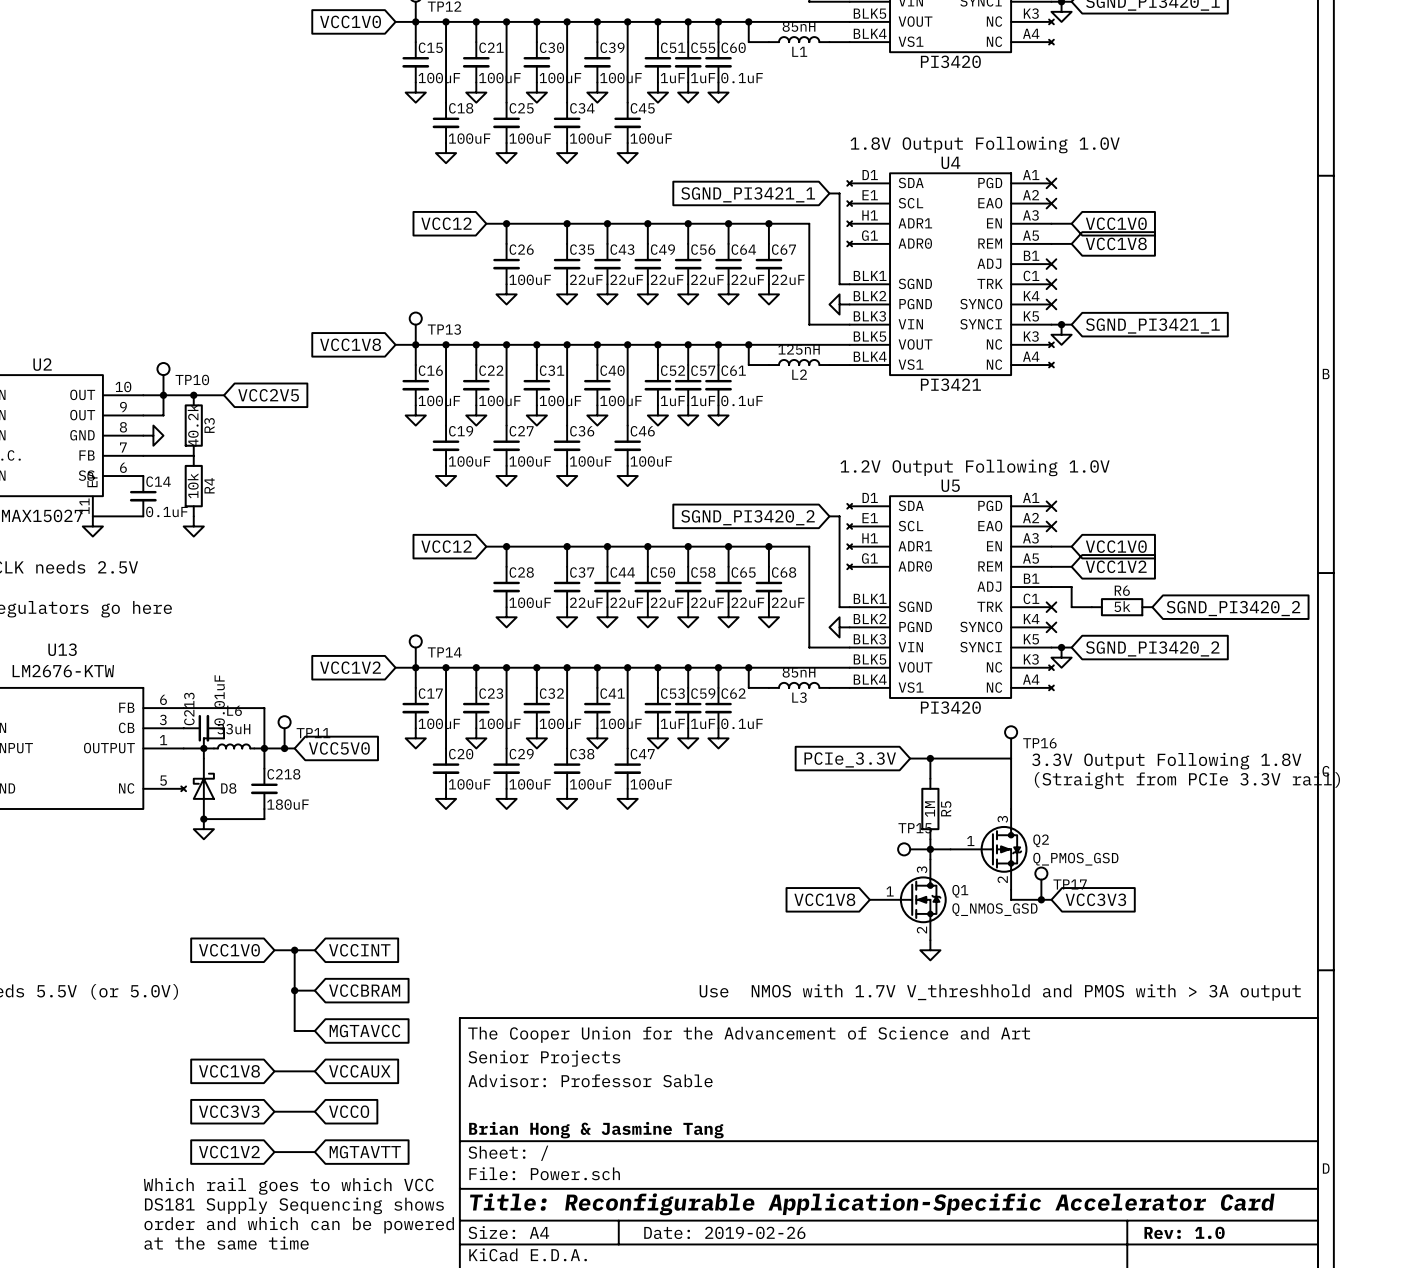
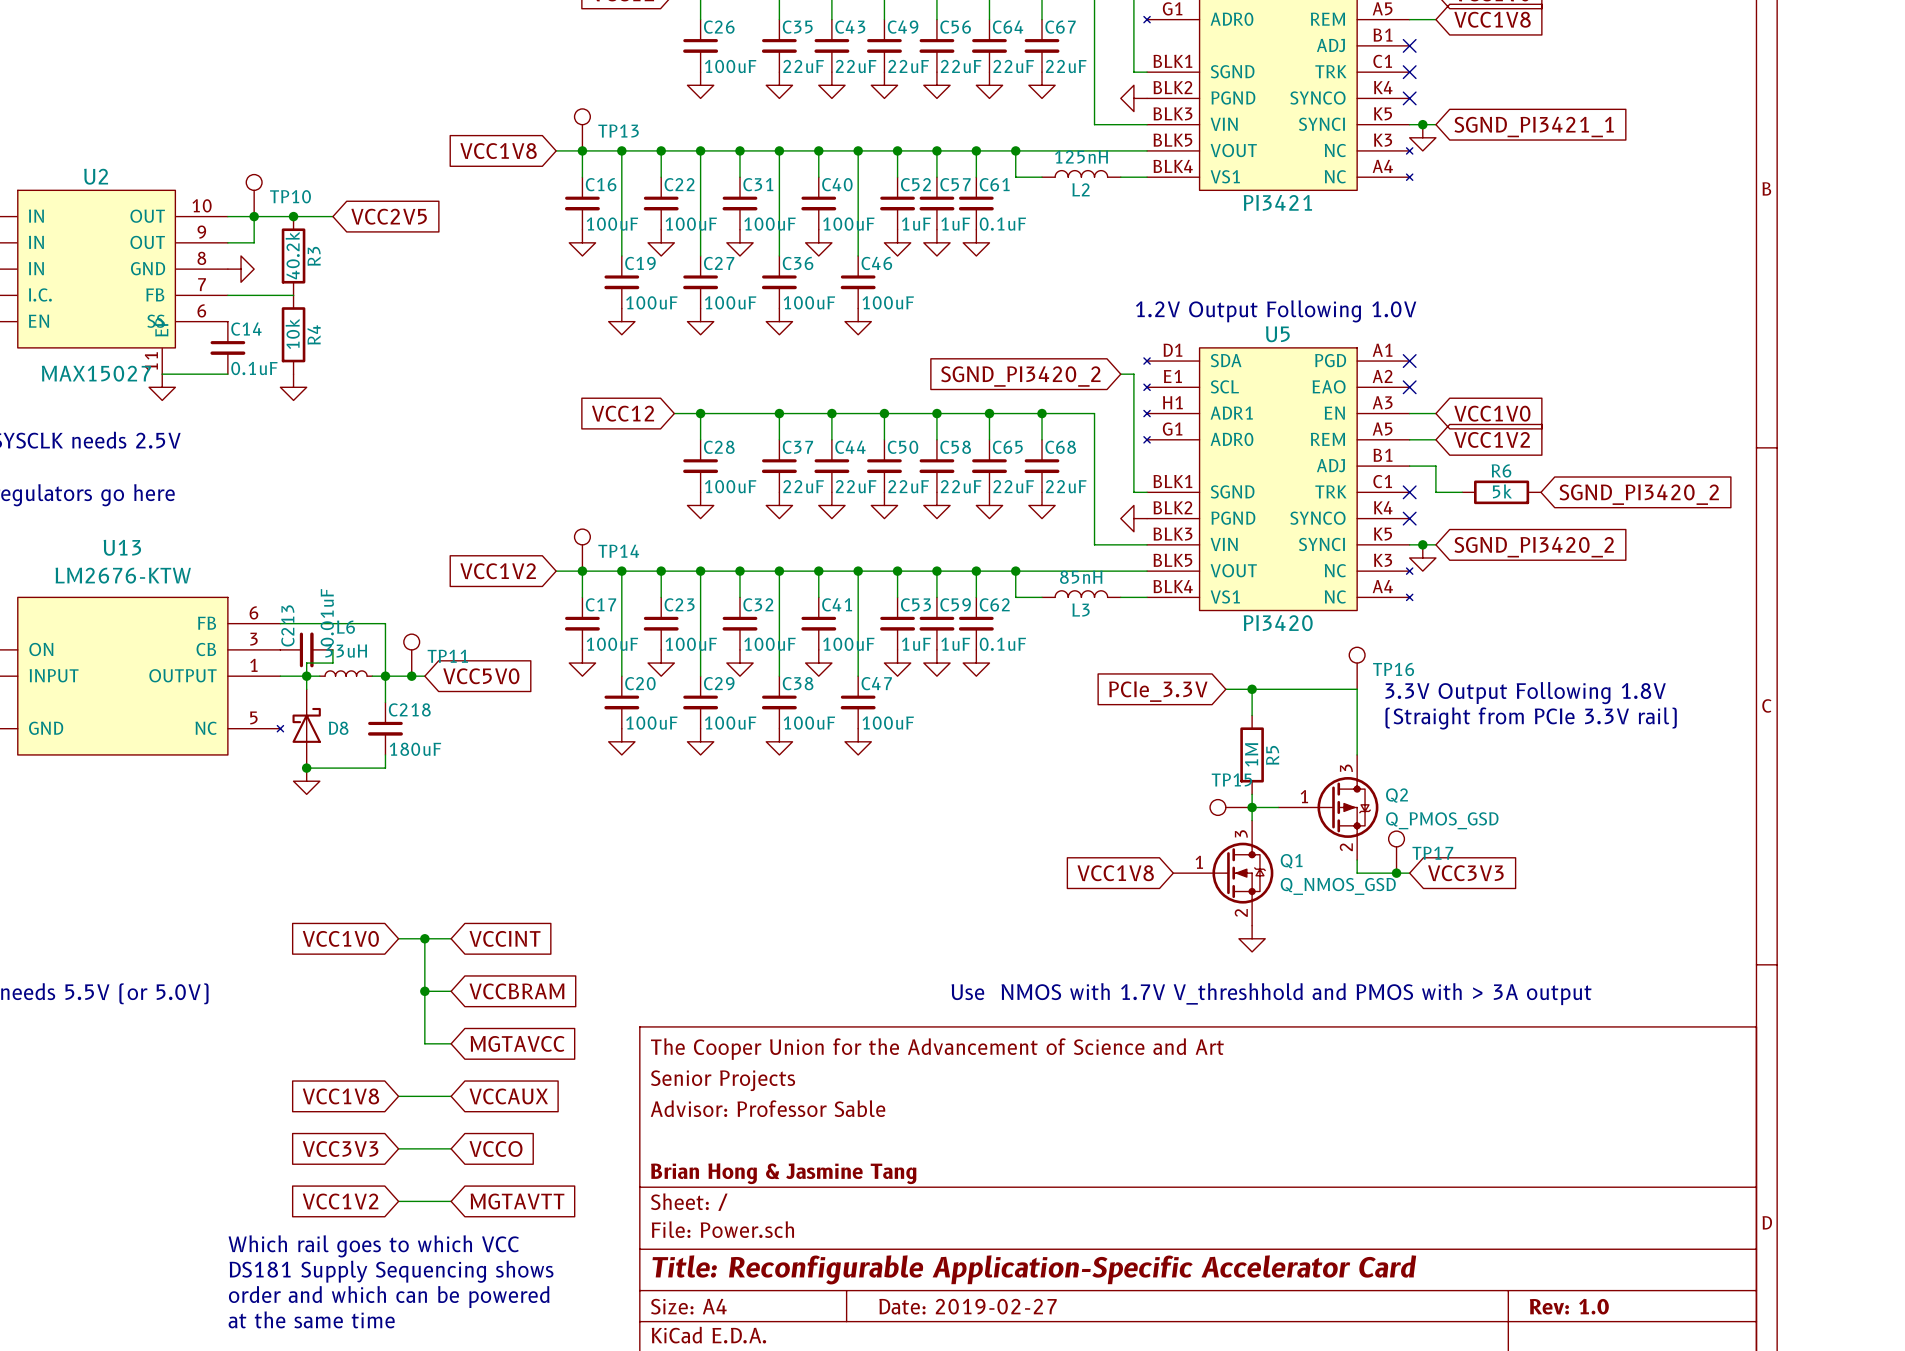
title block: Date: 2019-02-26 (724, 1232) -> Date: 2019-02-27 (968, 1306)

